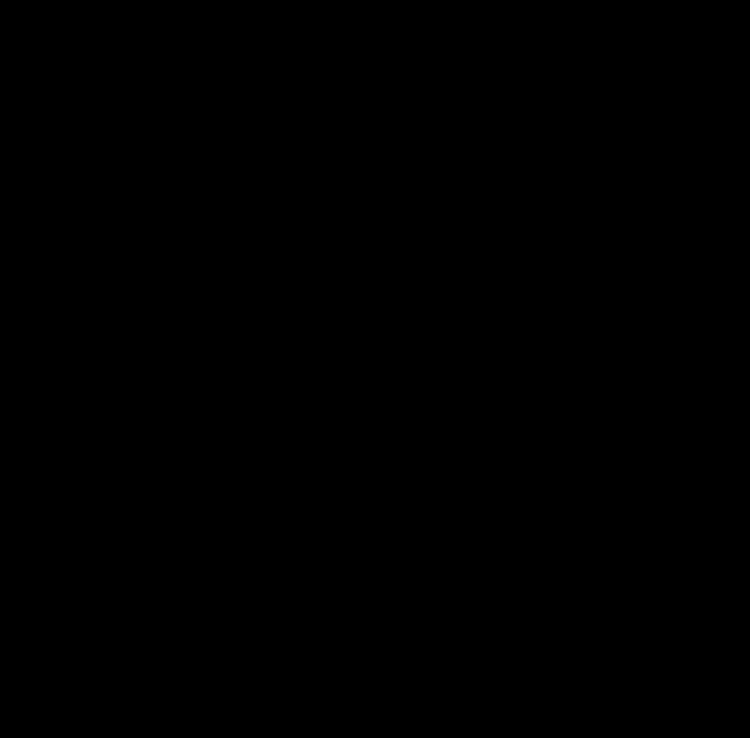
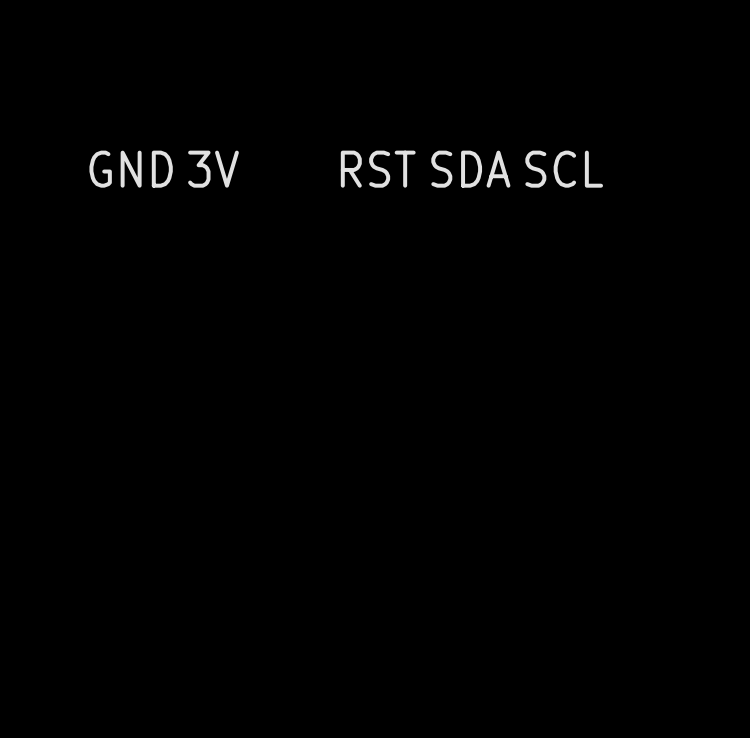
text: none -> GND (131, 169)
text: none -> 3V (213, 169)
text: none -> RST (378, 169)
text: none -> SDA (470, 169)
text: none -> SCL (564, 169)

